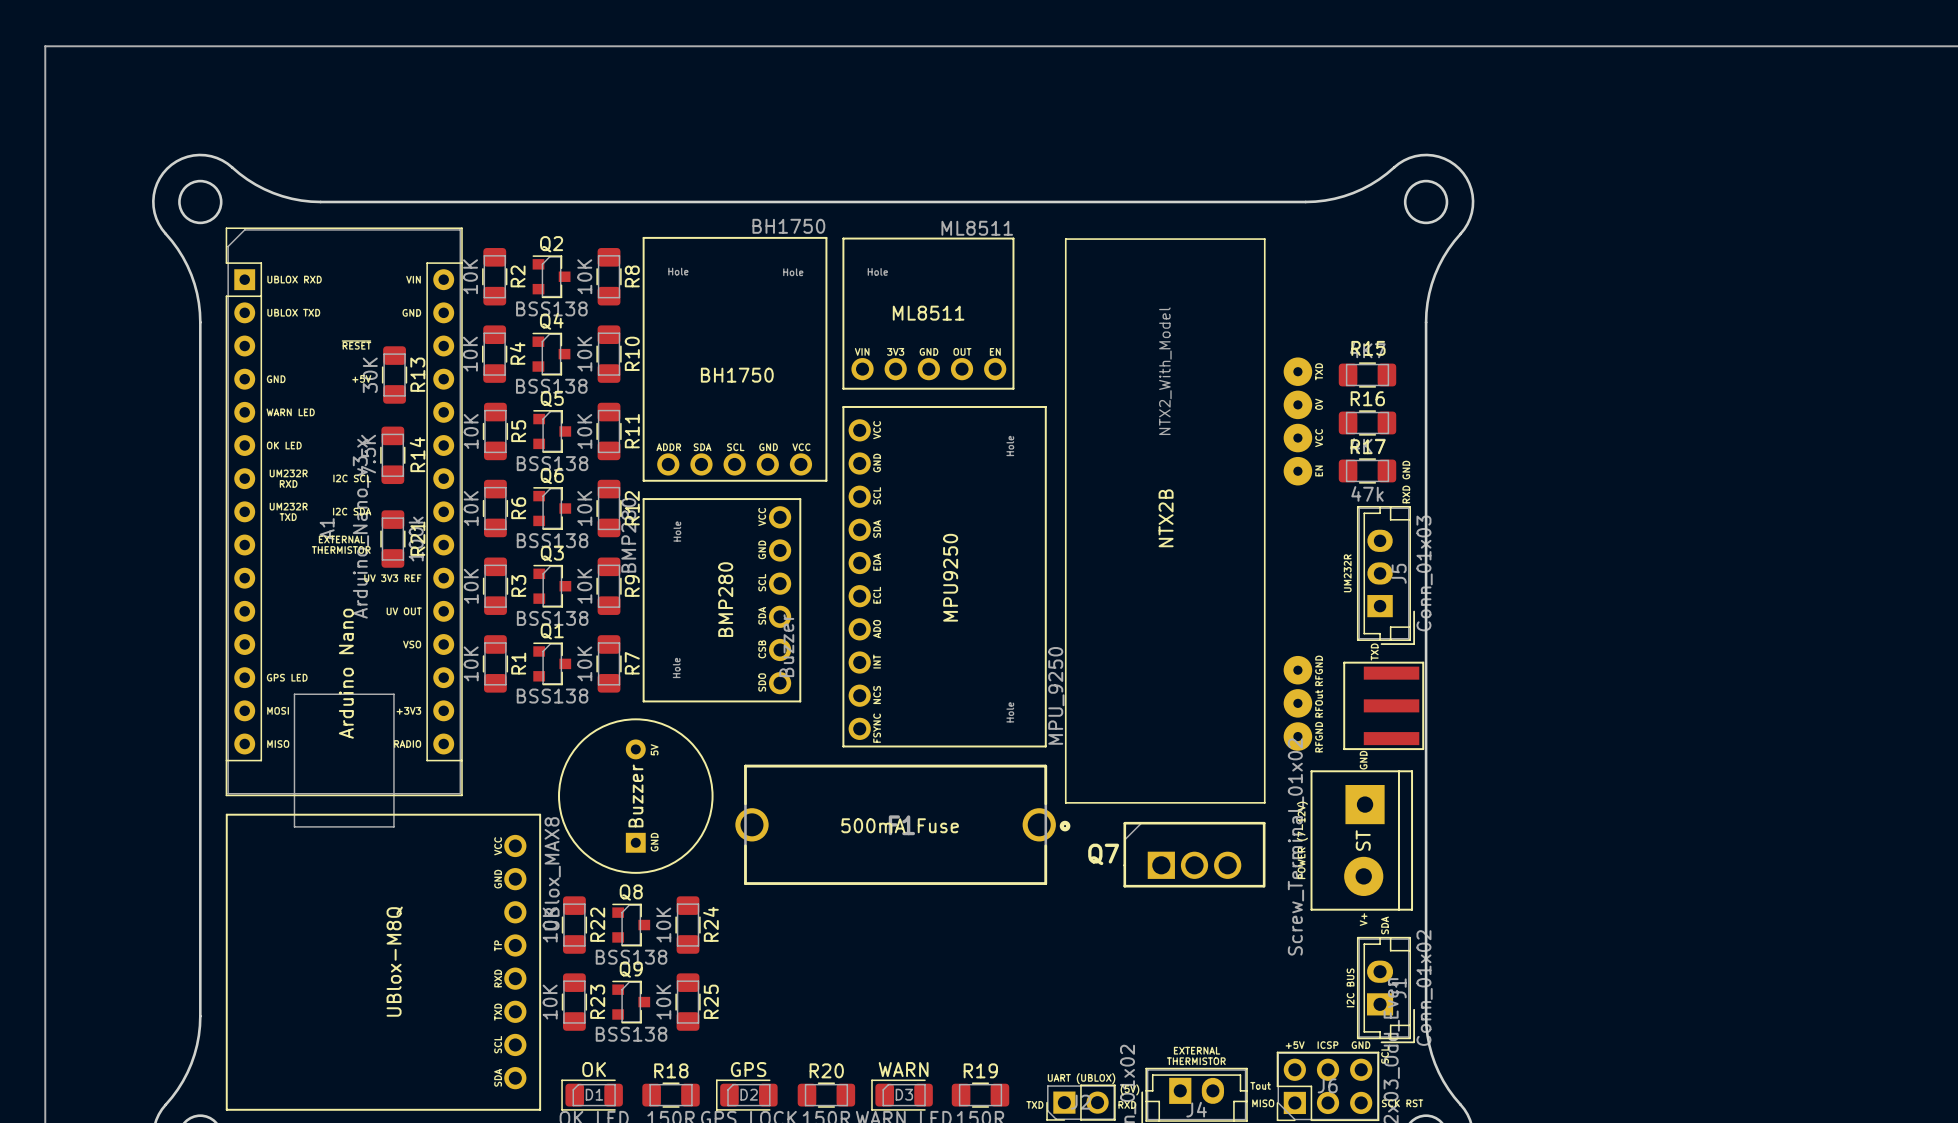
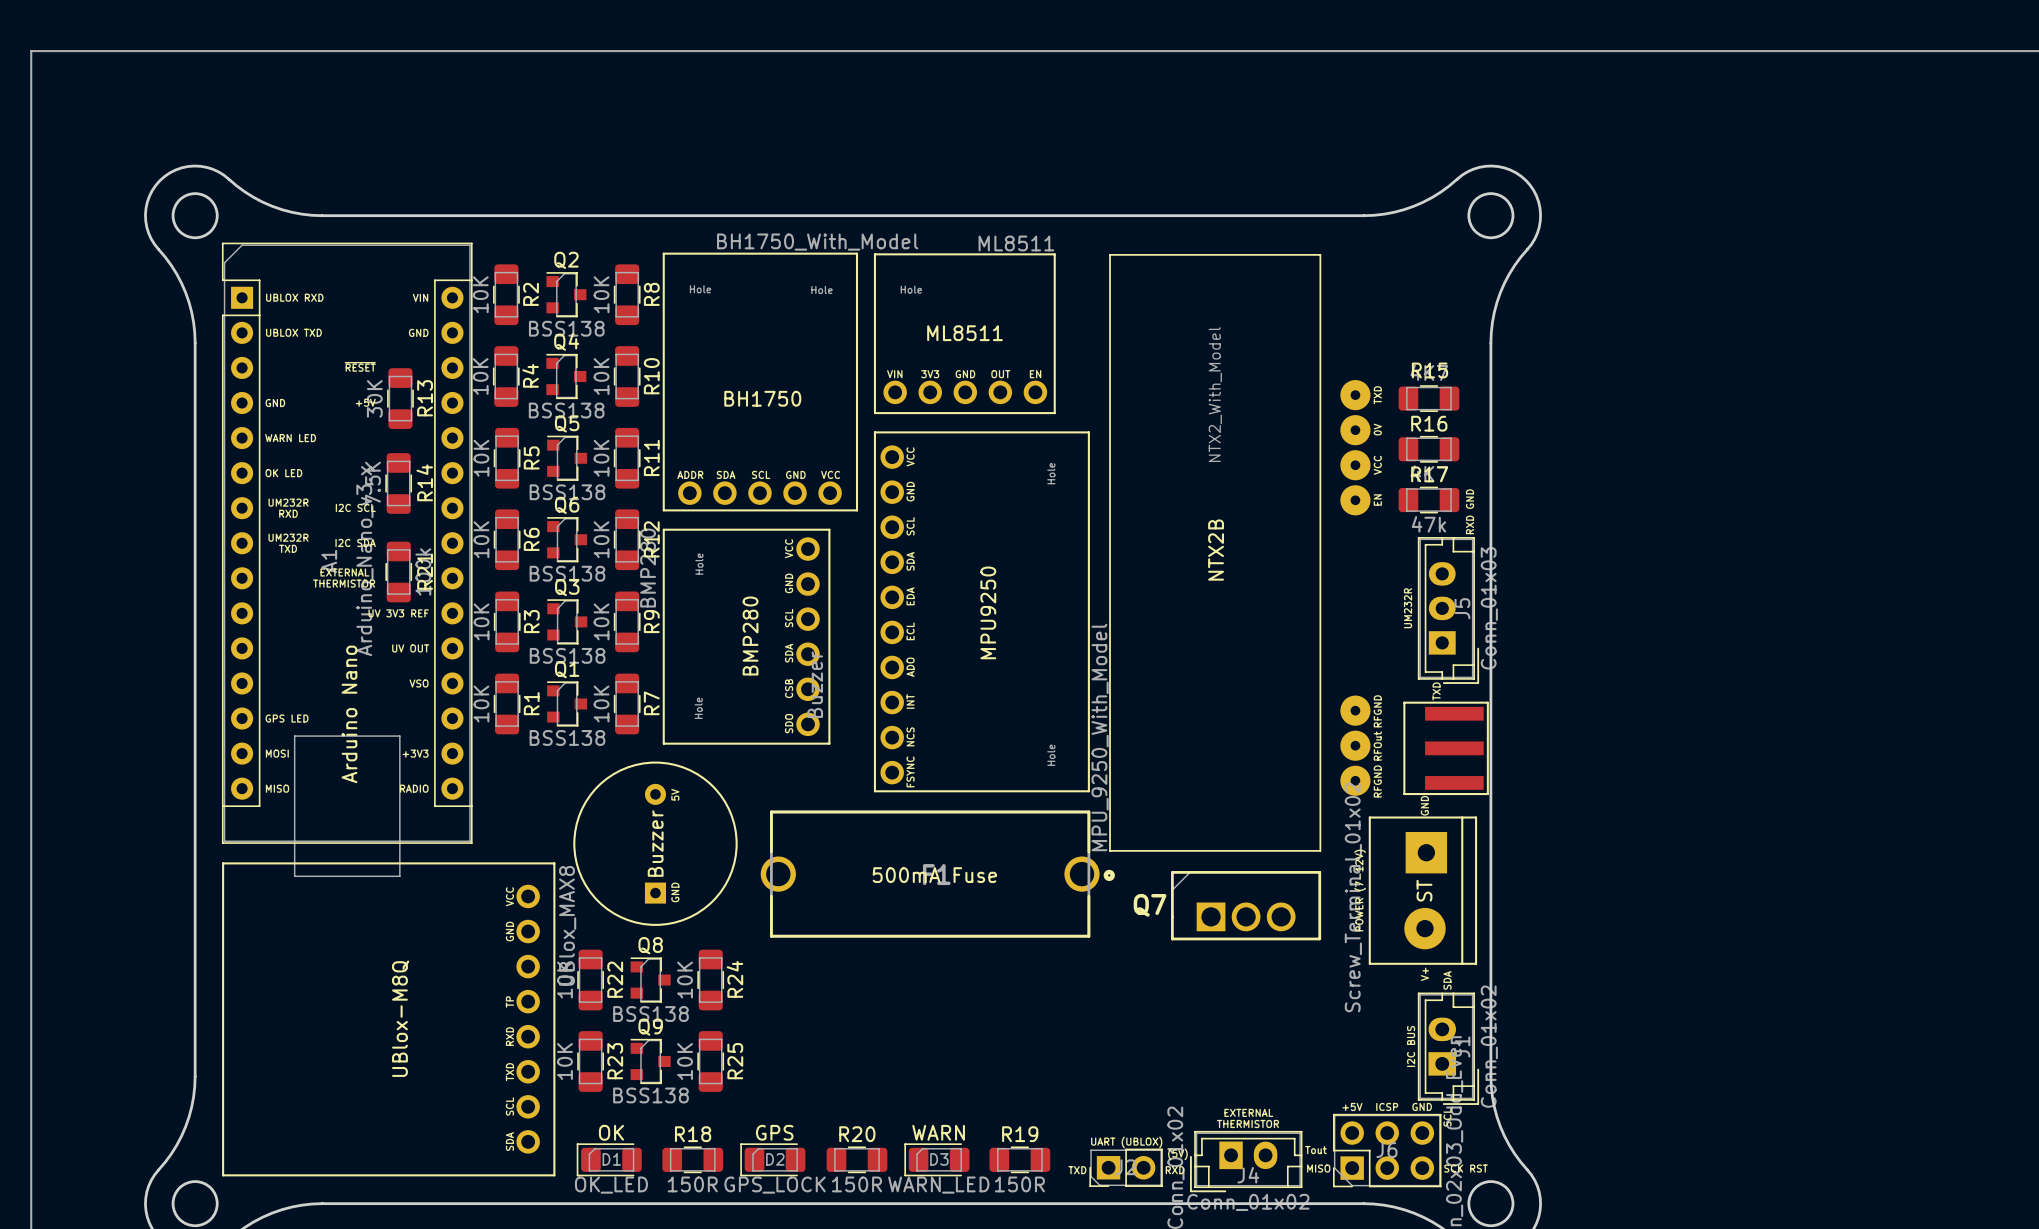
part value: BH1750 (788, 226) -> BH1750_With_Model (817, 242)
part value: MPU_9250 (1056, 695) -> MPU_9250_With_Model (1100, 737)

